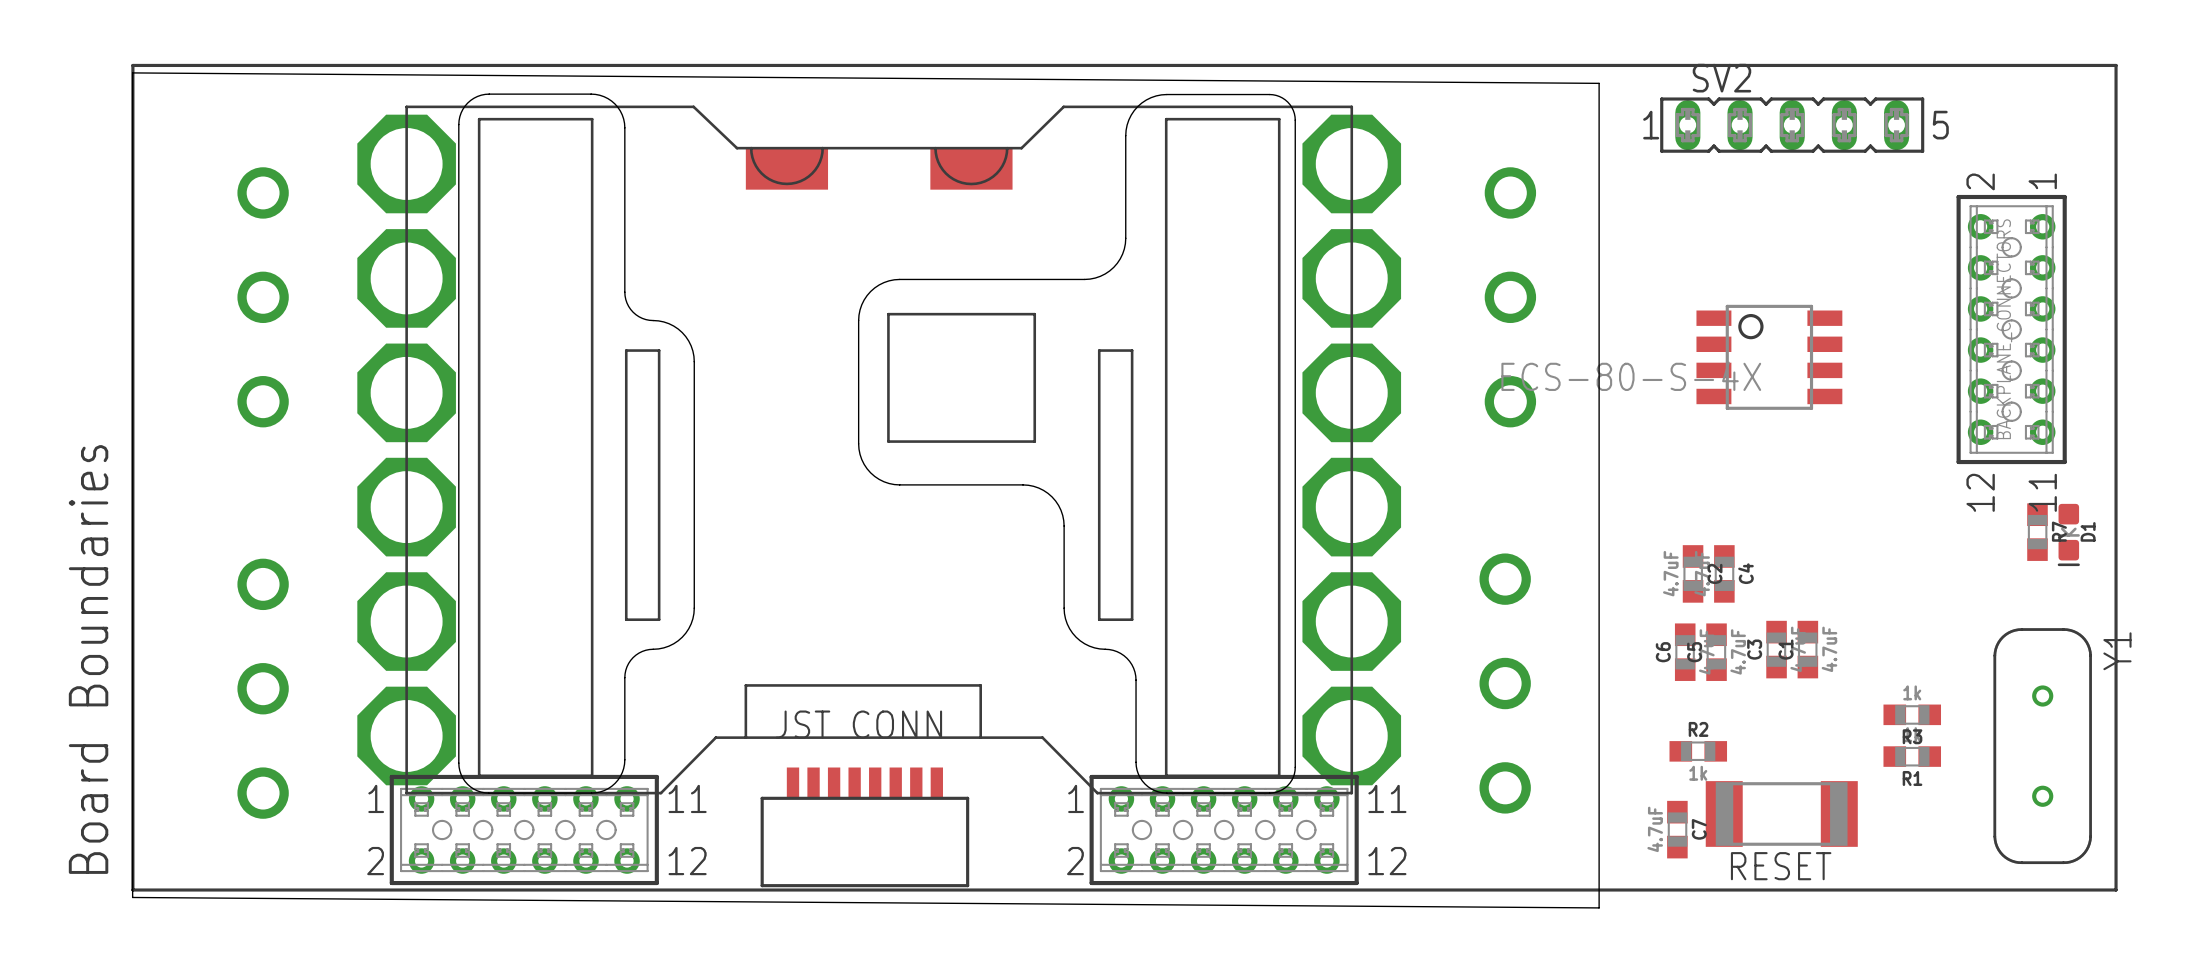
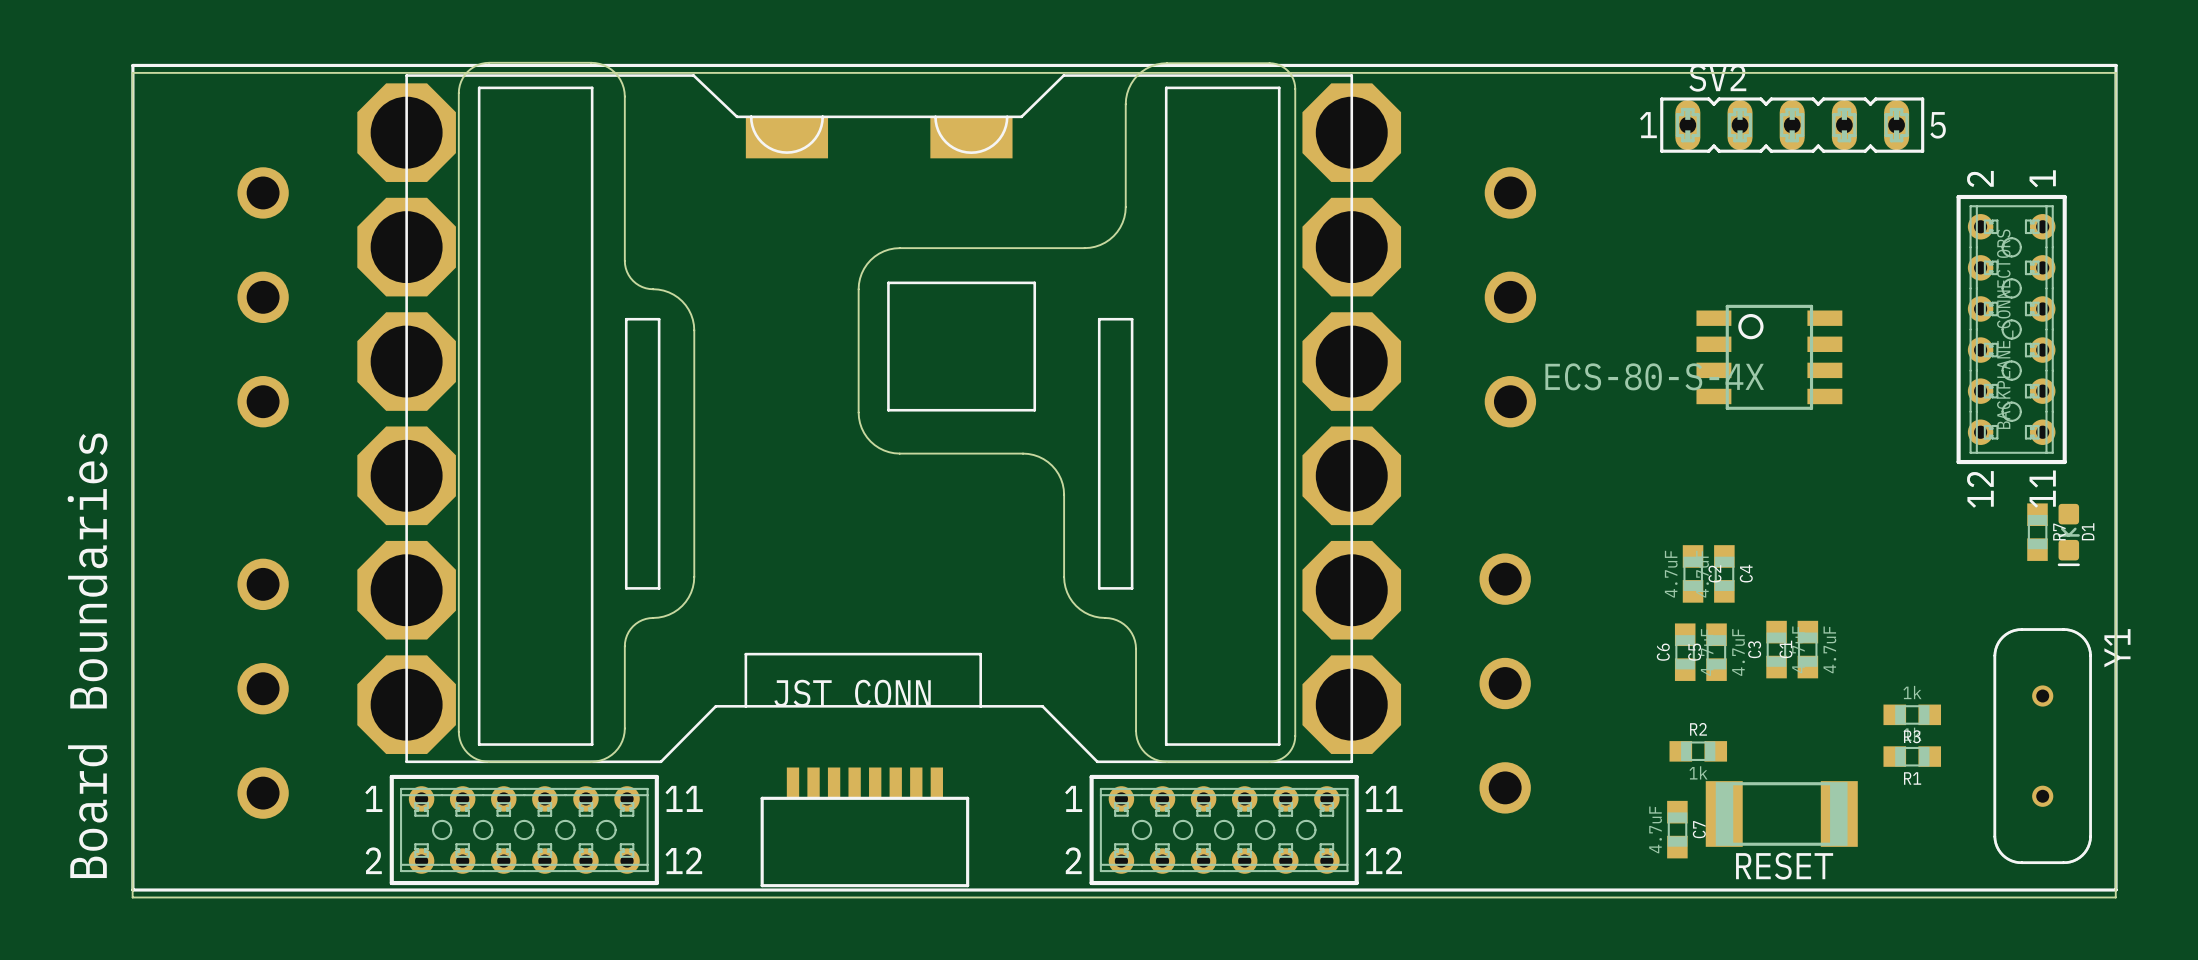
board edge: (132, 72) (1599, 83) (1599, 907) (132, 897) -> (132, 72) (2115, 72) (2115, 897) (132, 897)
part position: (879, 444) -> (879, 412)

